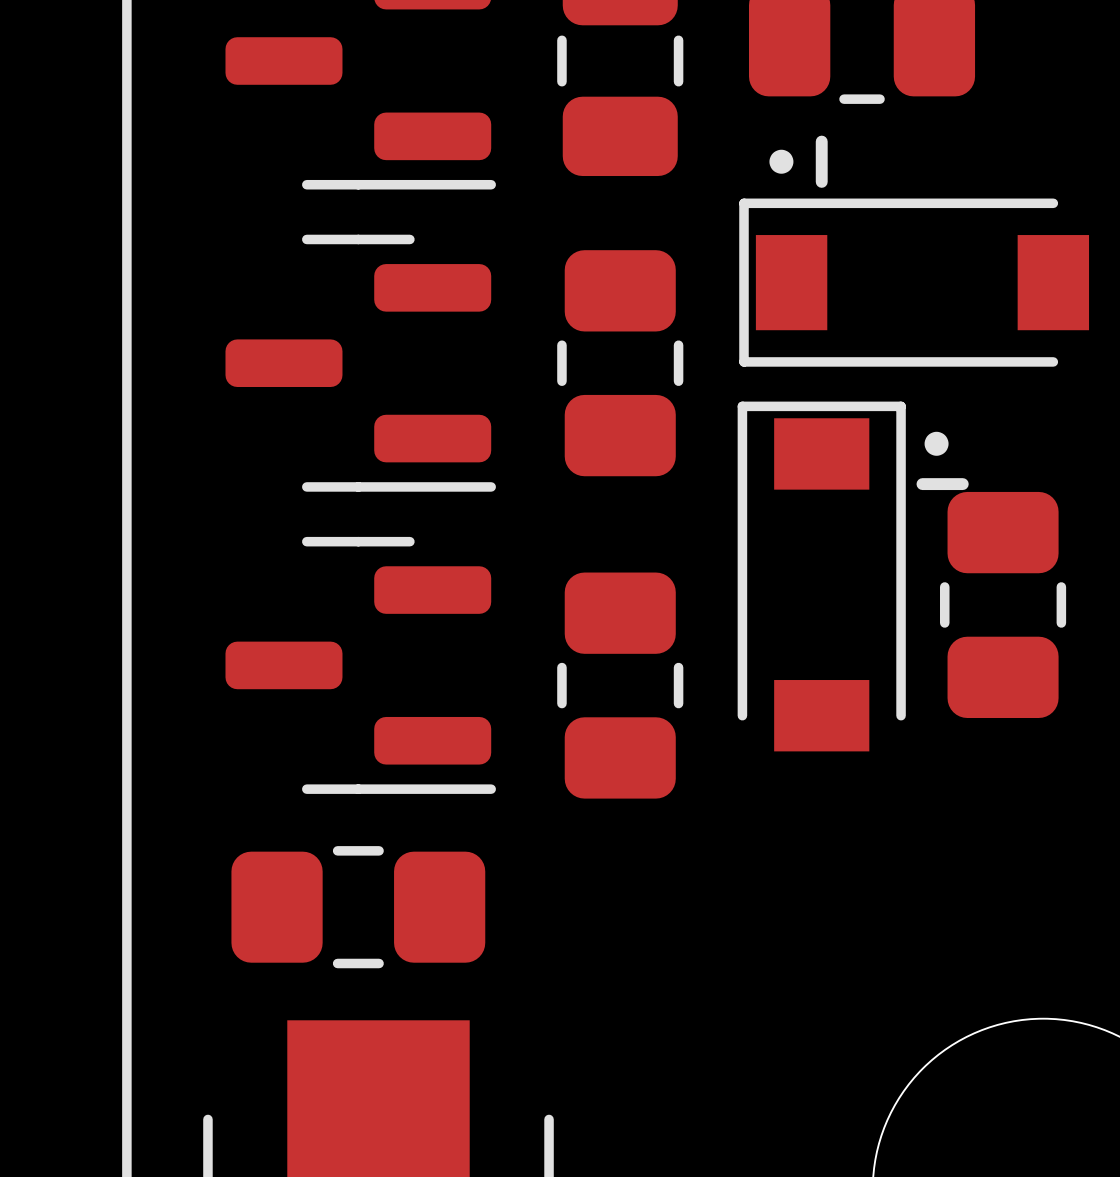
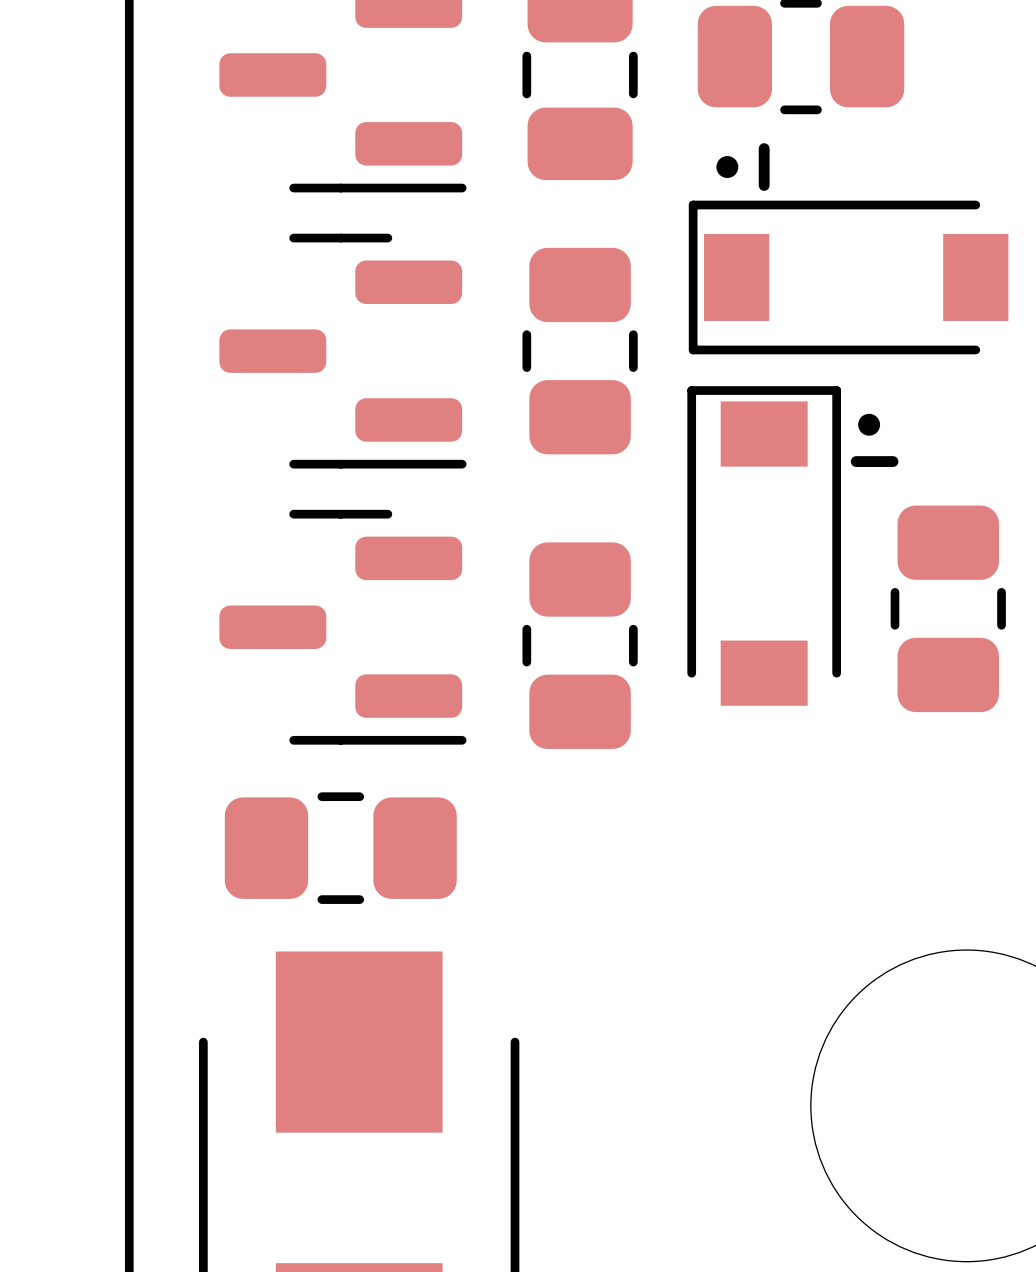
part position: (1003, 604) -> (948, 608)

